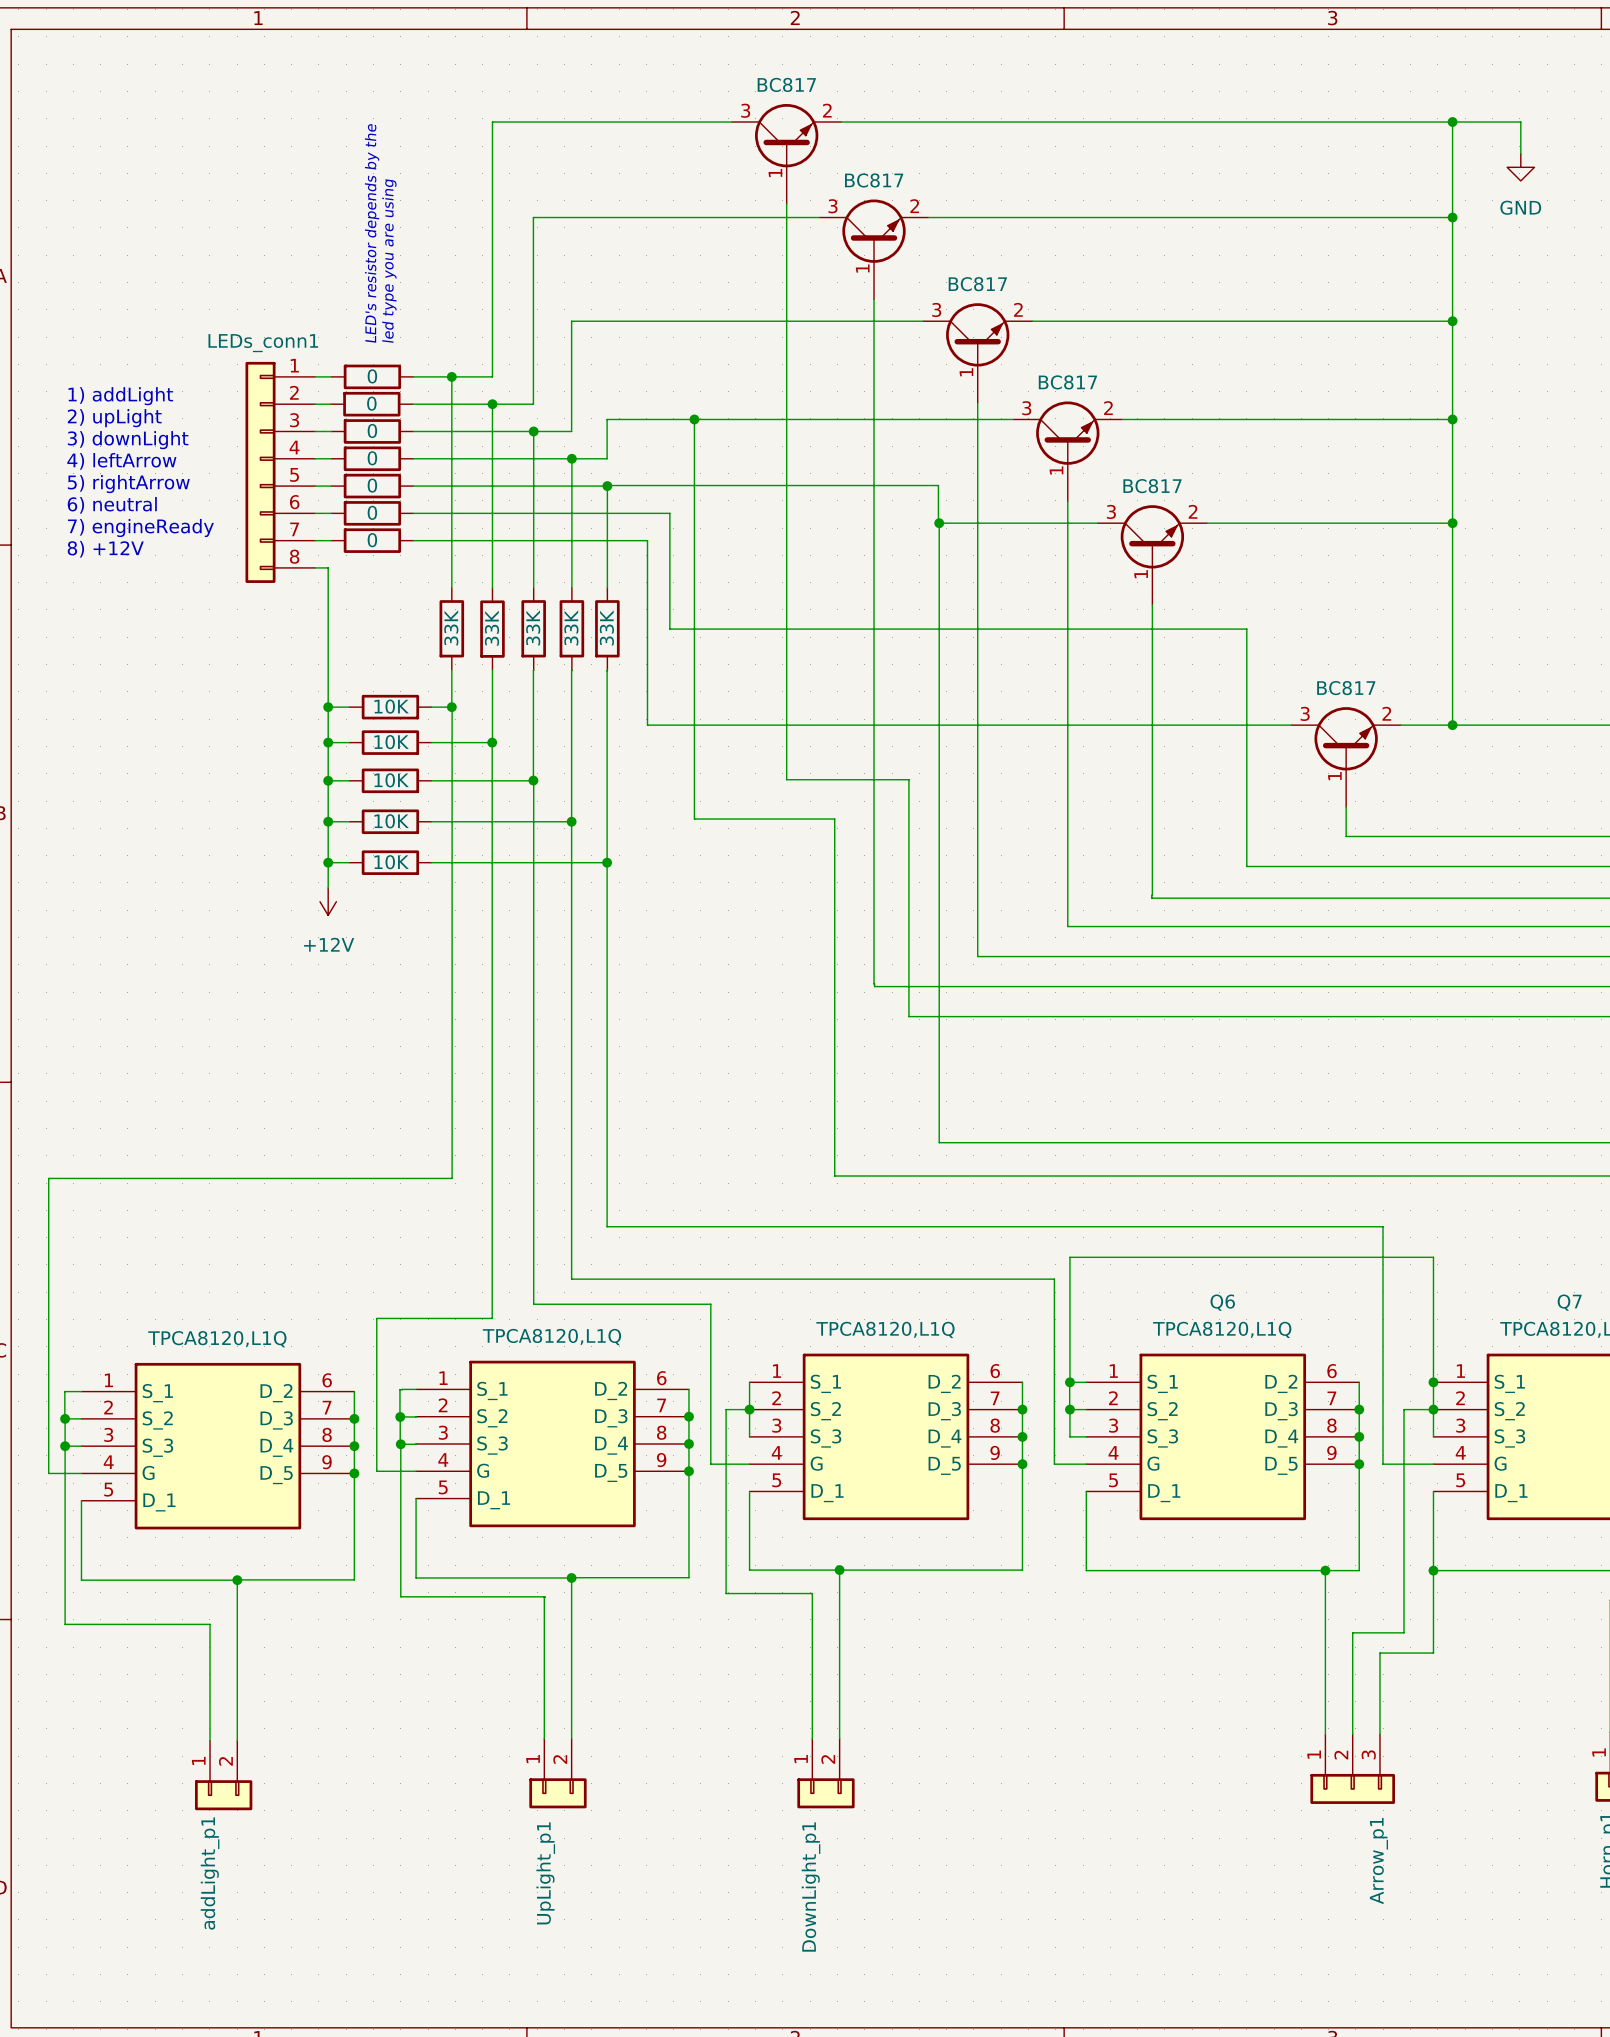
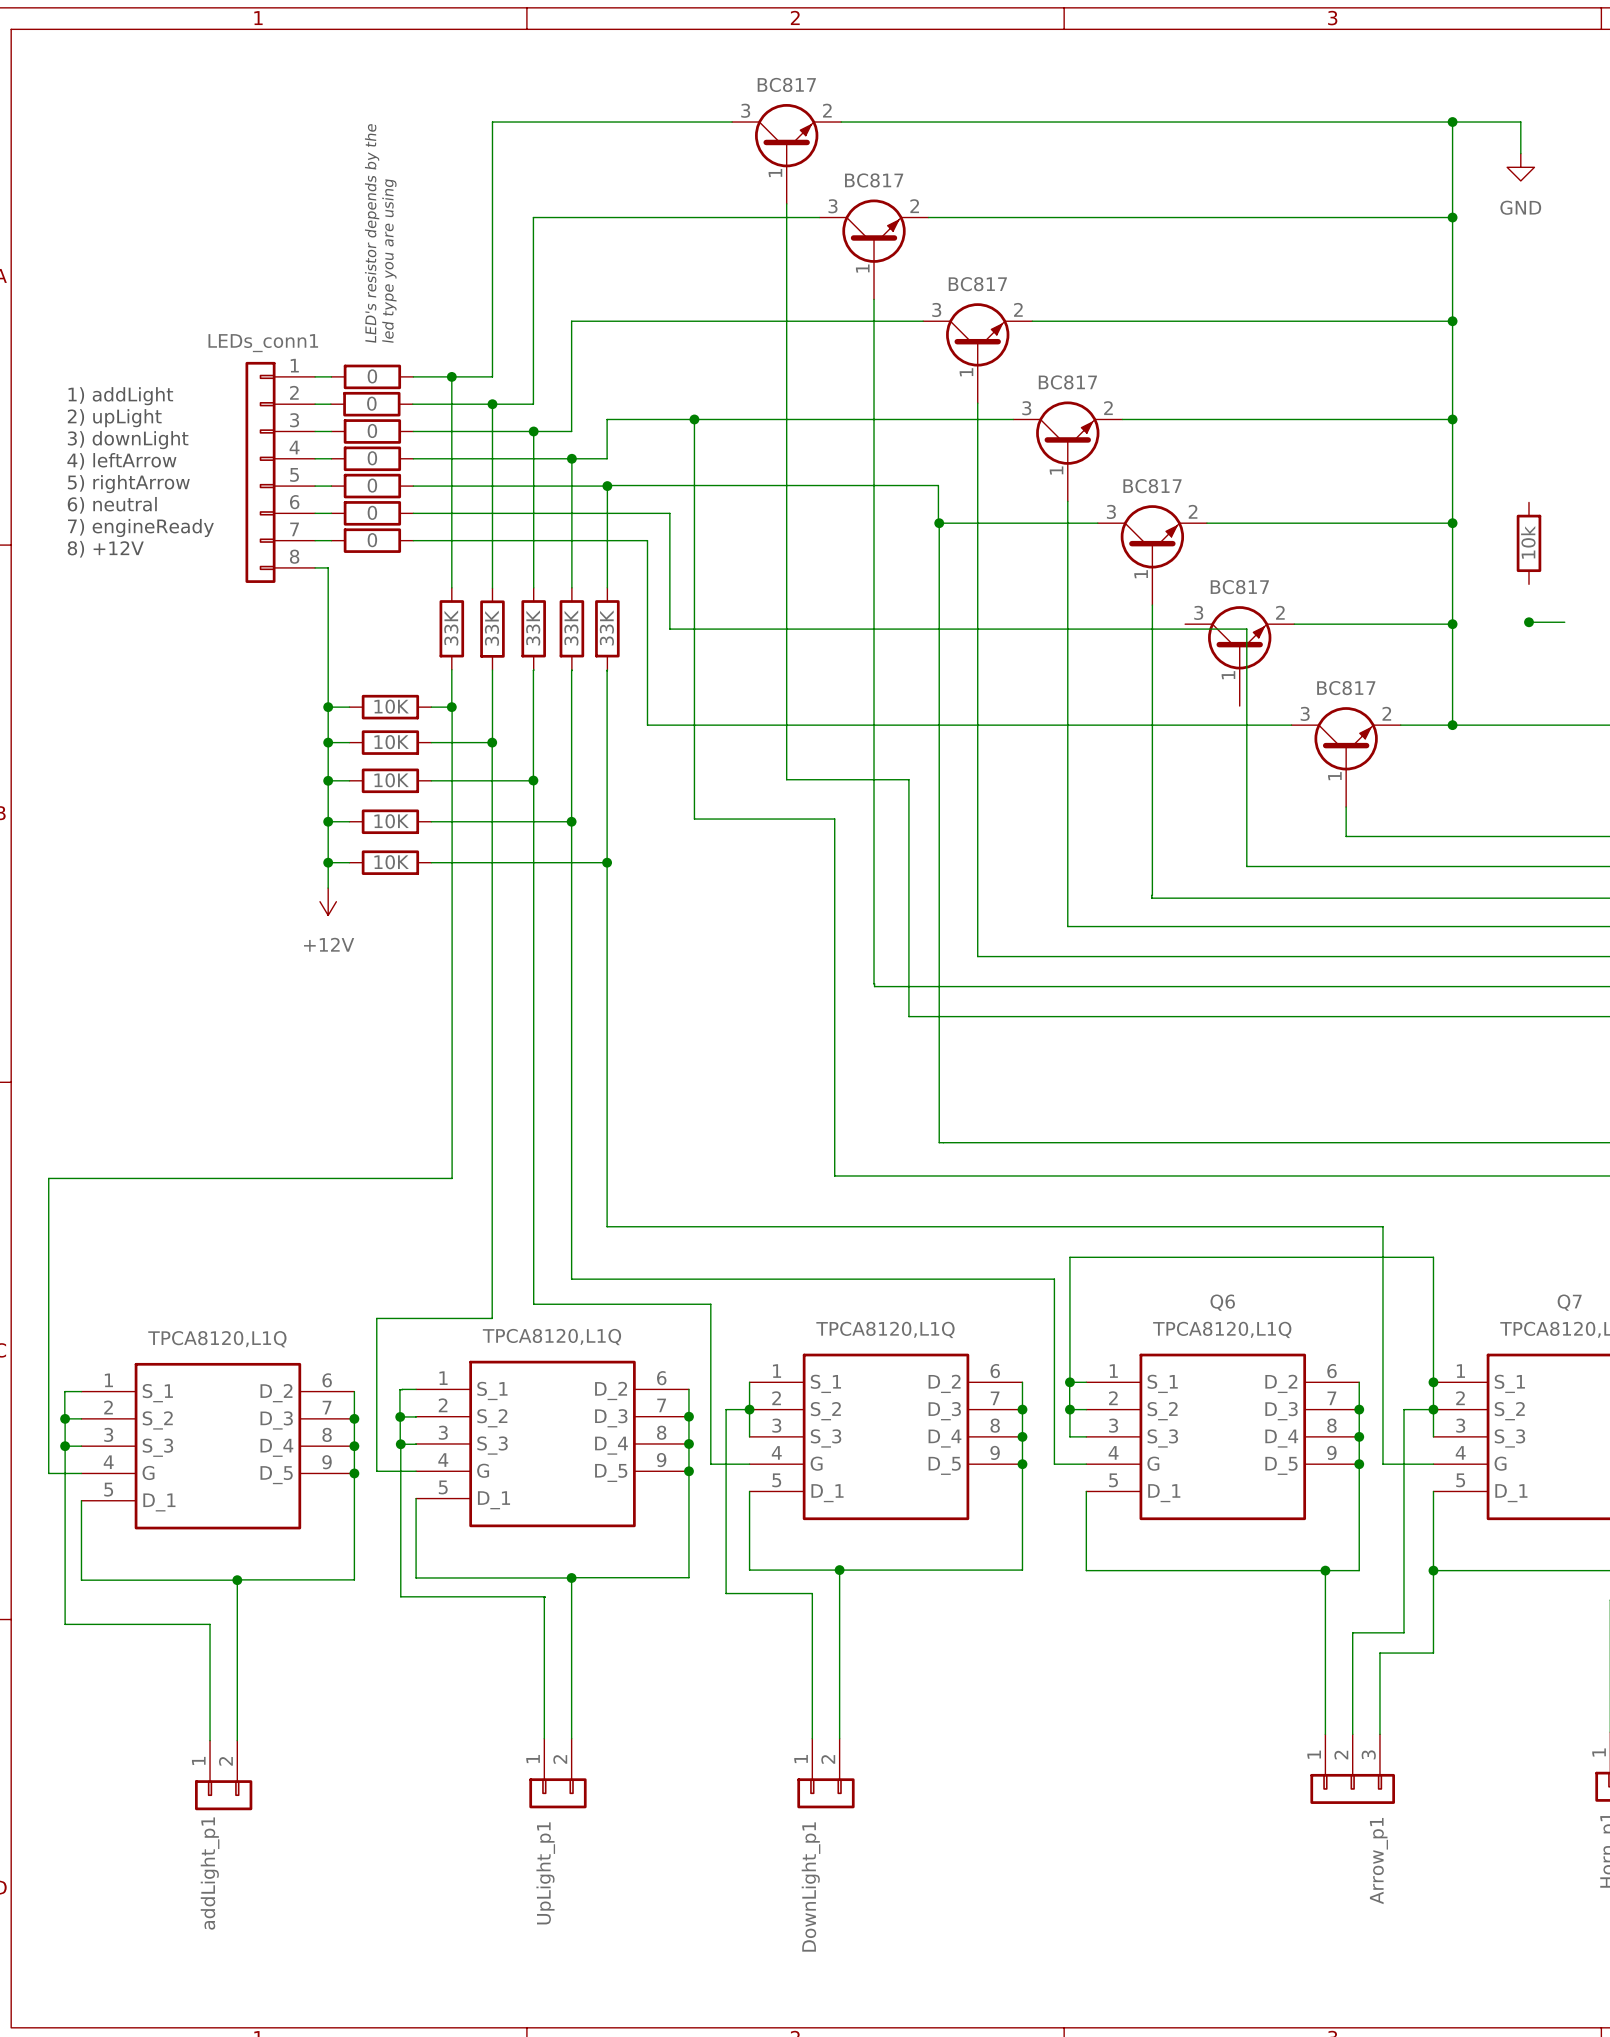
part: none -> 10k (1528, 543)
wire: none -> (1528, 622) (1564, 622)
junction: none -> (1528, 622)
wire: none -> (1294, 624) (1452, 624)
junction: none -> (1452, 624)
part: none -> BC817 (1239, 656)

